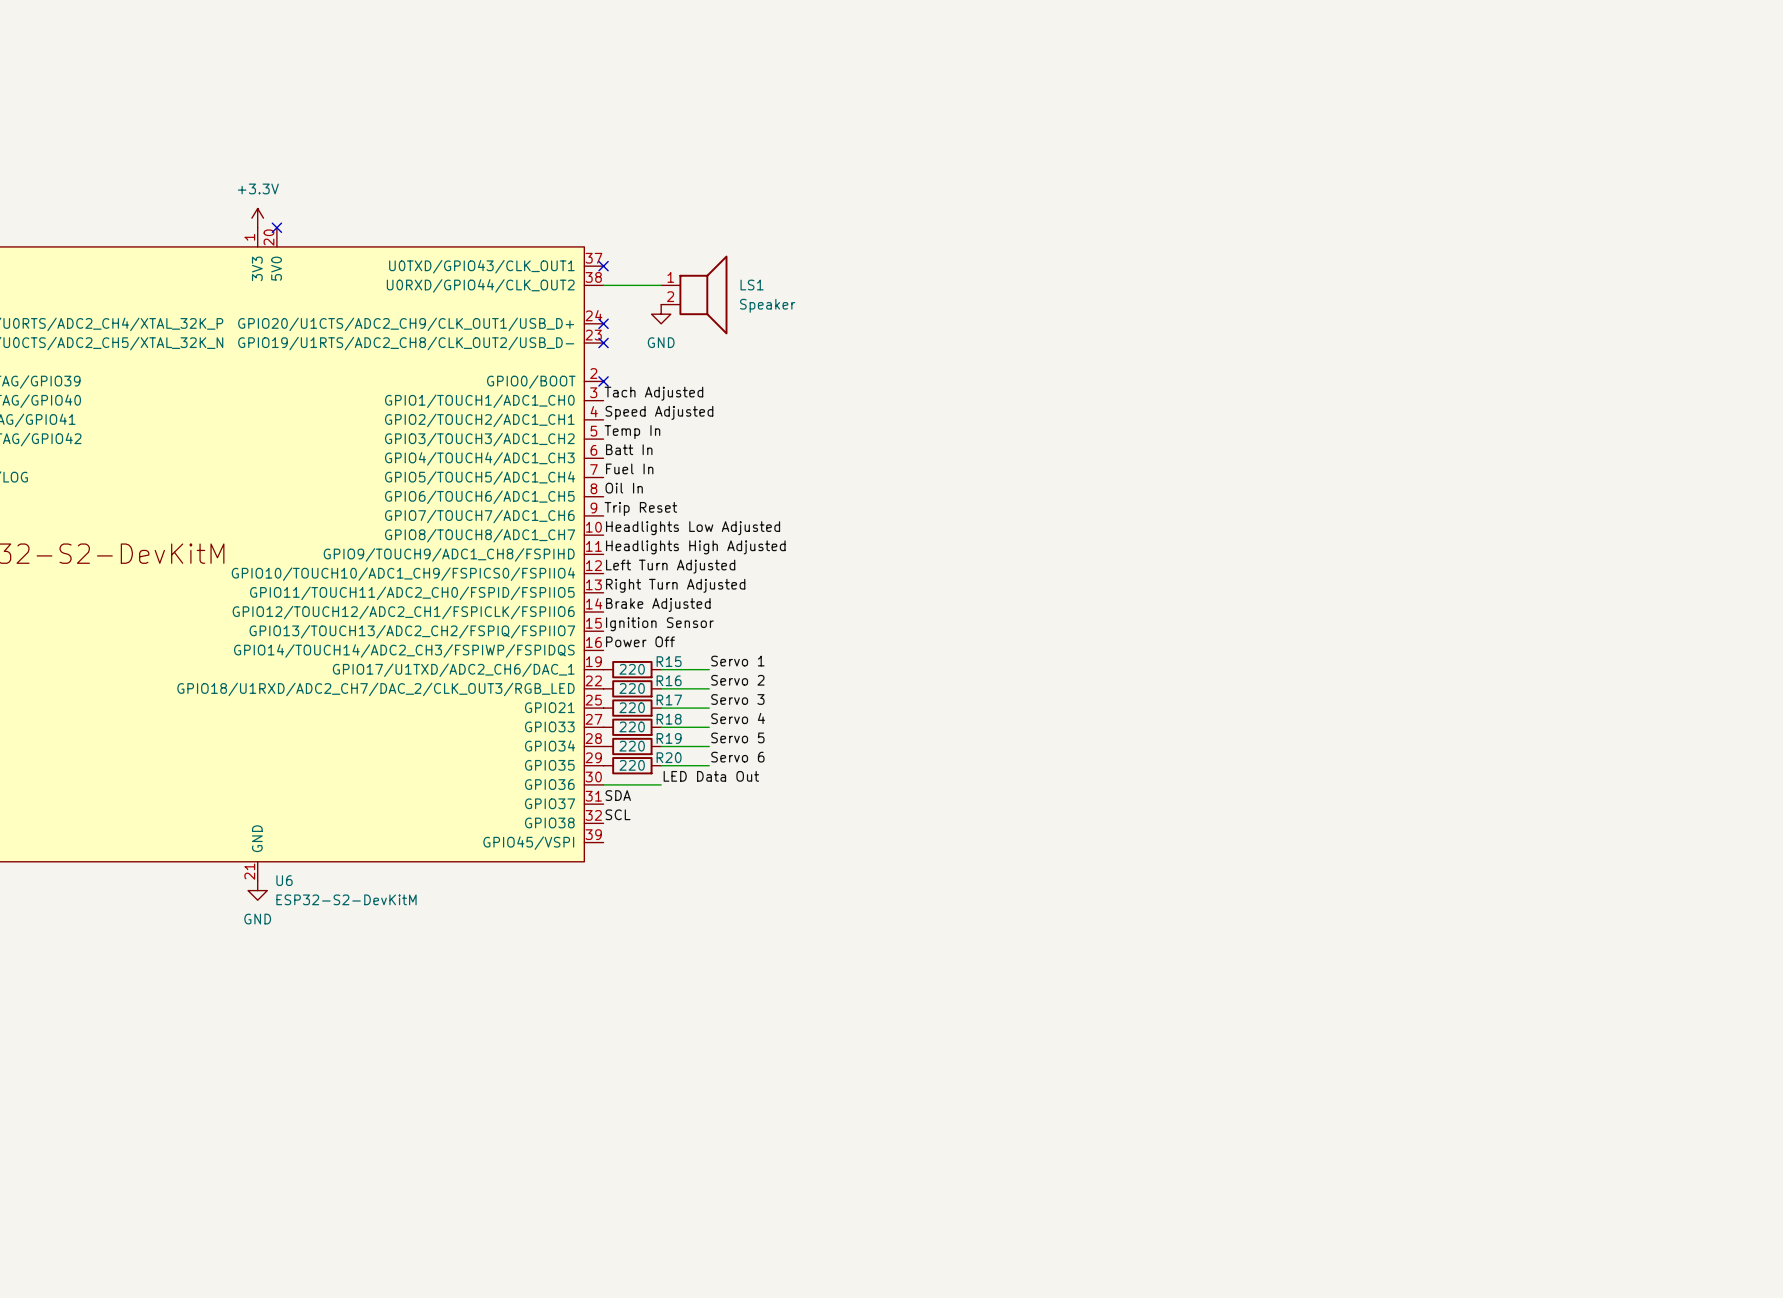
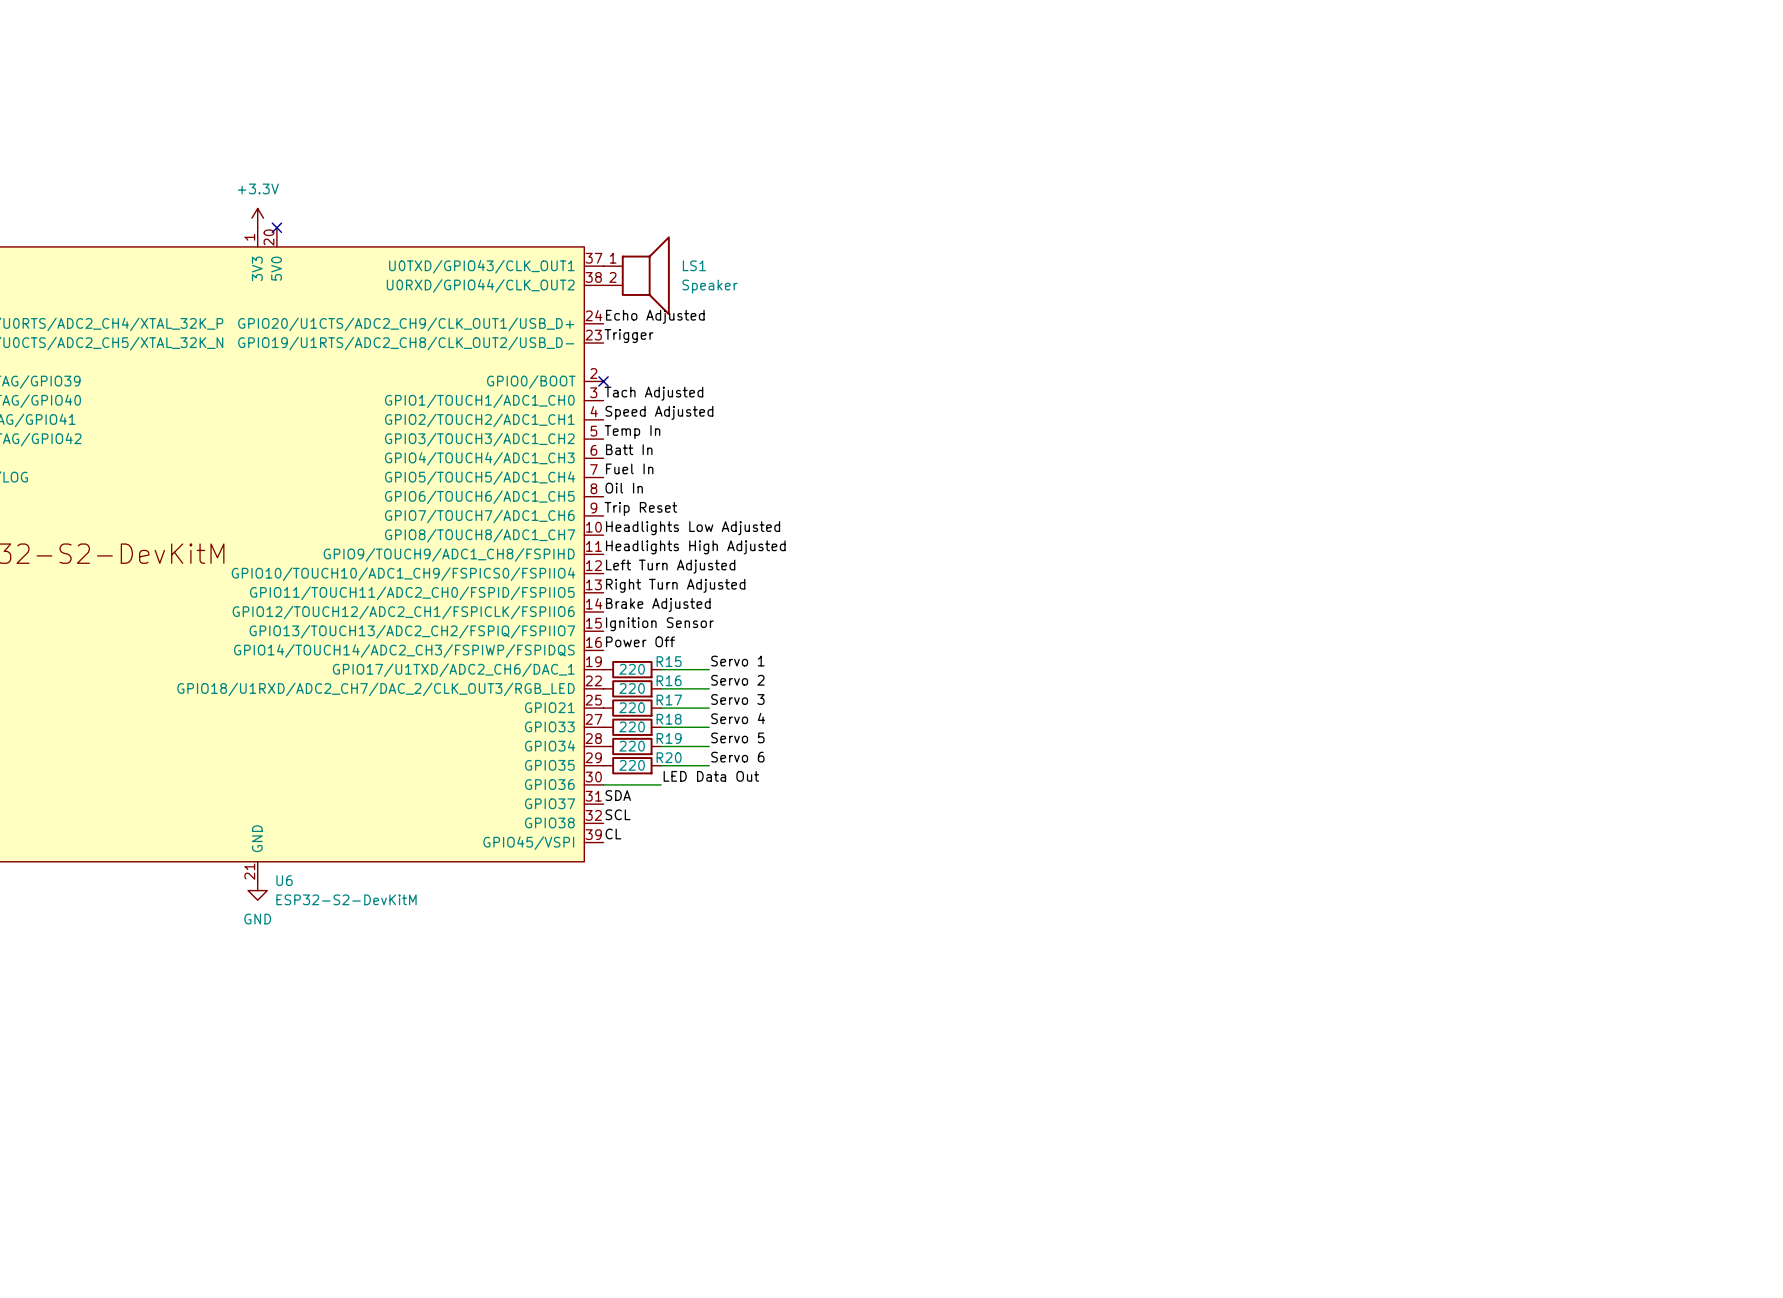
no-connect mark: (603, 266) -> none
wire: (603, 285) (661, 285) -> none
LS1 position: (694, 294) -> (636, 275)
power symbol: GND (661, 314) -> none
label: none -> Echo Adjusted (655, 316)
no-connect mark: (603, 323) -> none
label: none -> Trigger (629, 336)
no-connect mark: (603, 343) -> none
label: none -> CL (613, 833)

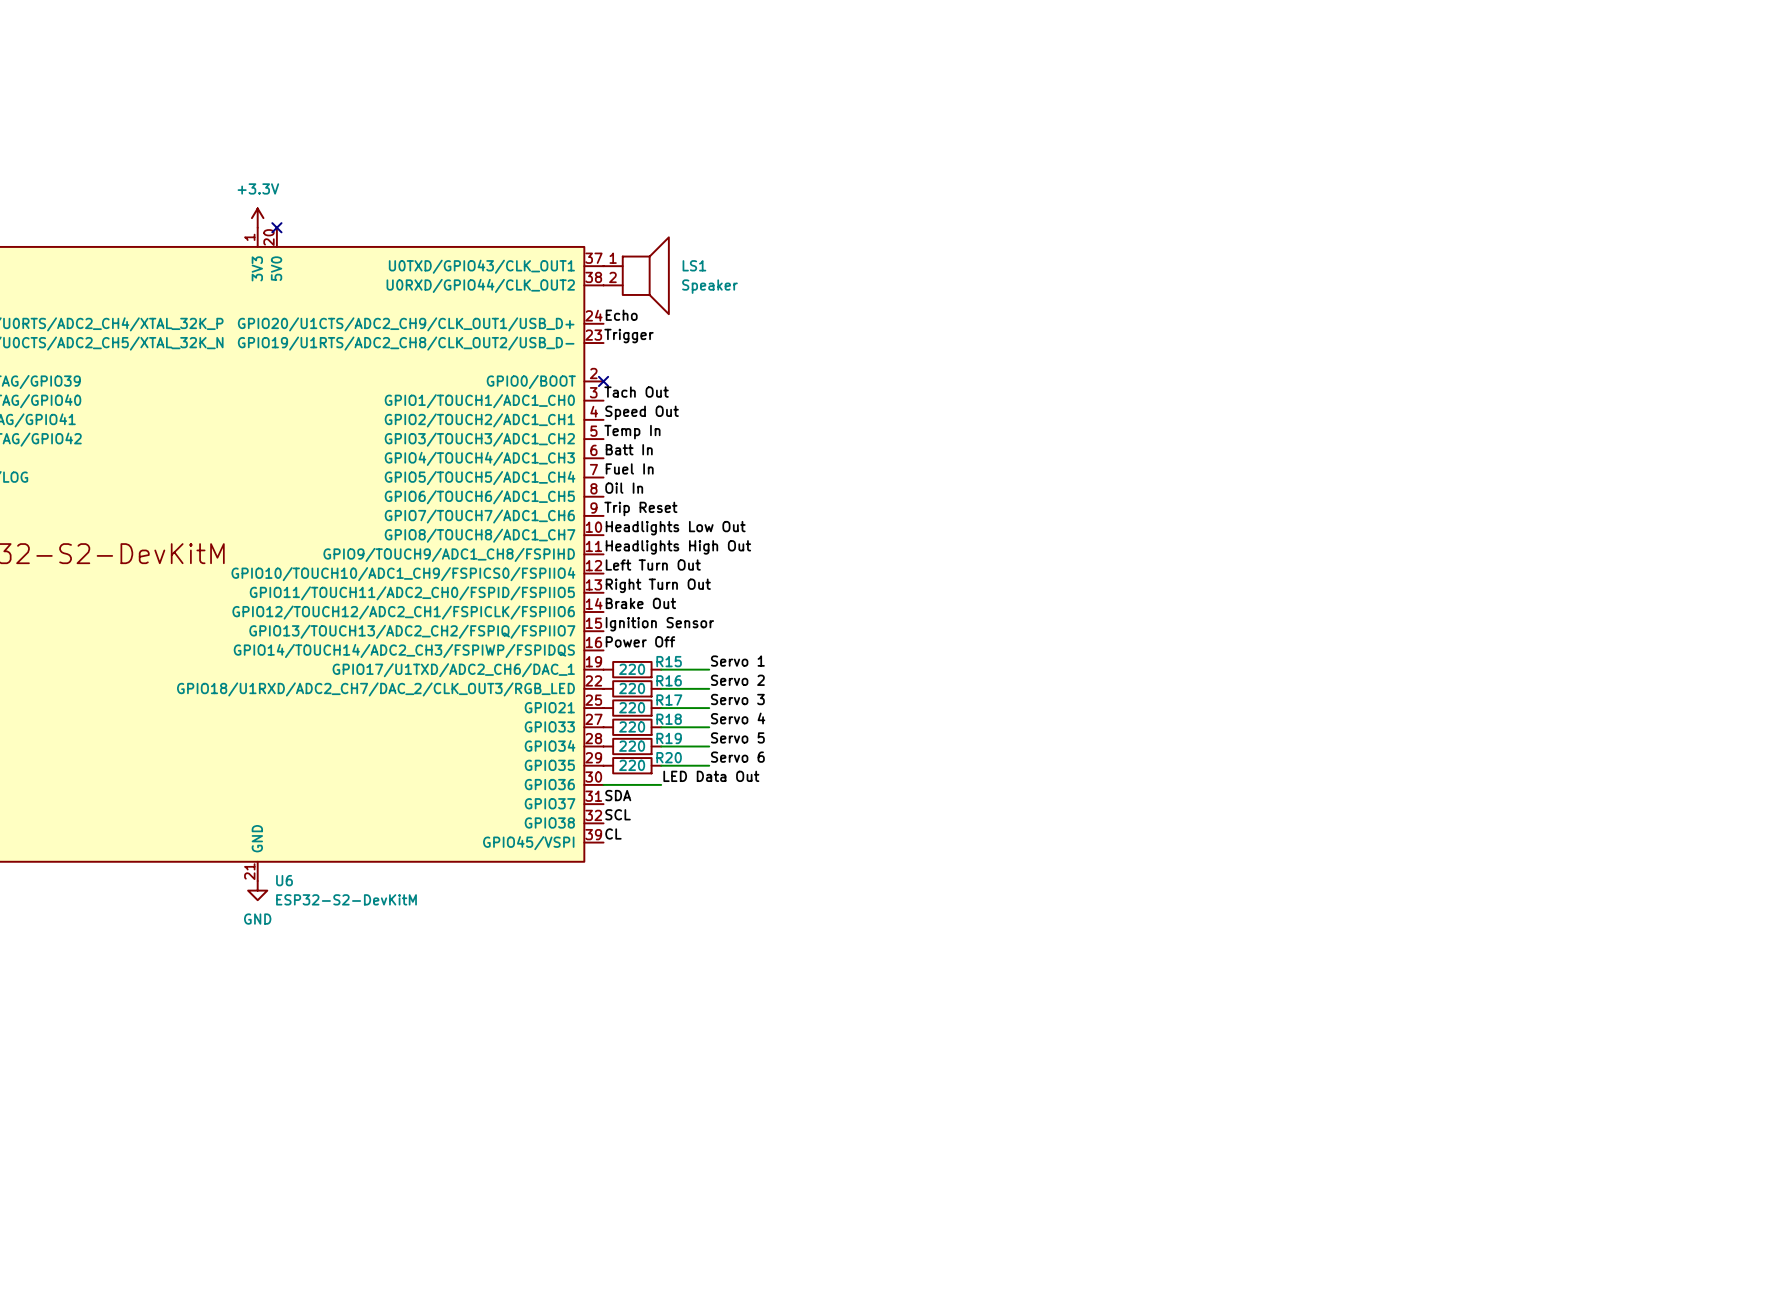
label: Echo Adjusted (655, 316) -> Echo (621, 315)
label: Tach Adjusted (653, 393) -> Tach Out (636, 392)
label: Speed Adjusted (659, 412) -> Speed Out (642, 412)
label: Headlights Low Adjusted (693, 528) -> Headlights Low Out (675, 528)
label: Headlights High Adjusted (695, 547) -> Headlights High Out (678, 547)
label: Left Turn Adjusted (670, 566) -> Left Turn Out (653, 565)
label: Right Turn Adjusted (675, 585) -> Right Turn Out (658, 585)
label: Brake Adjusted (658, 605) -> Brake Out (640, 603)

